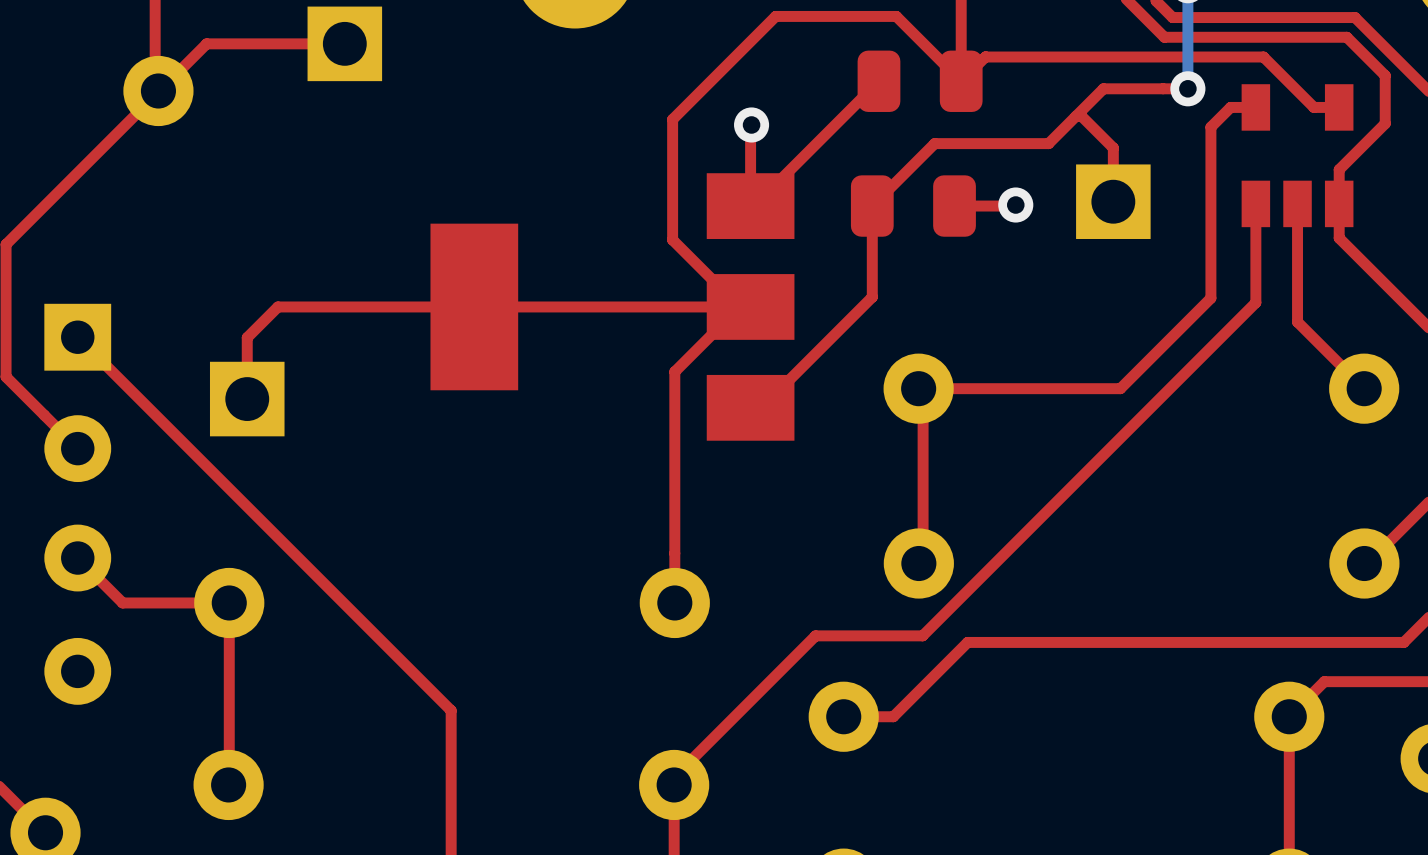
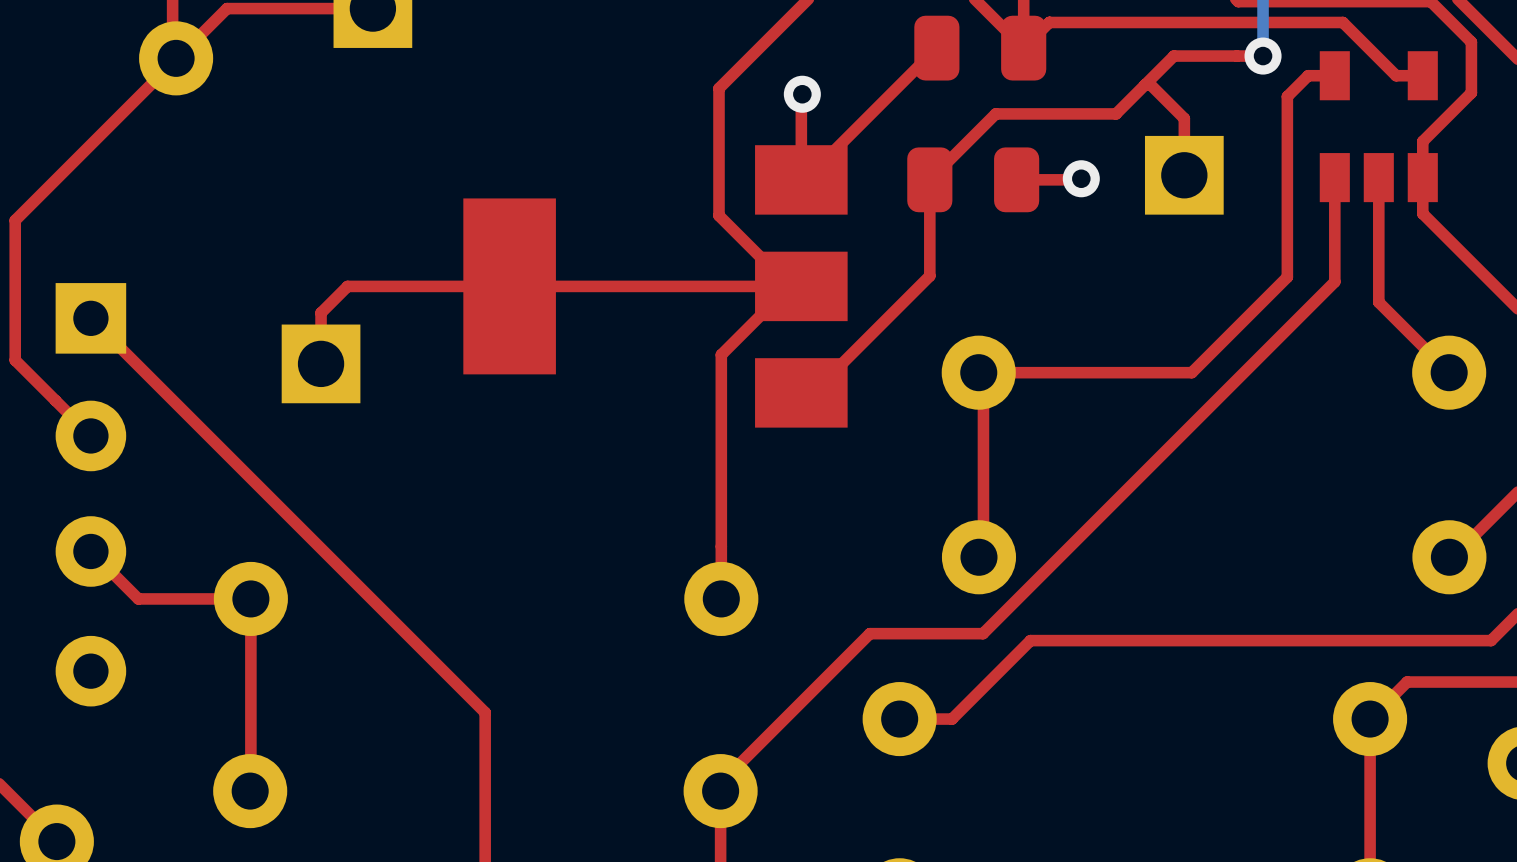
top track: (320, 306) (277, 306) (247, 337) (247, 399) -> (347, 286) (321, 312) (321, 363)
part position: (247, 399) -> (321, 363)

